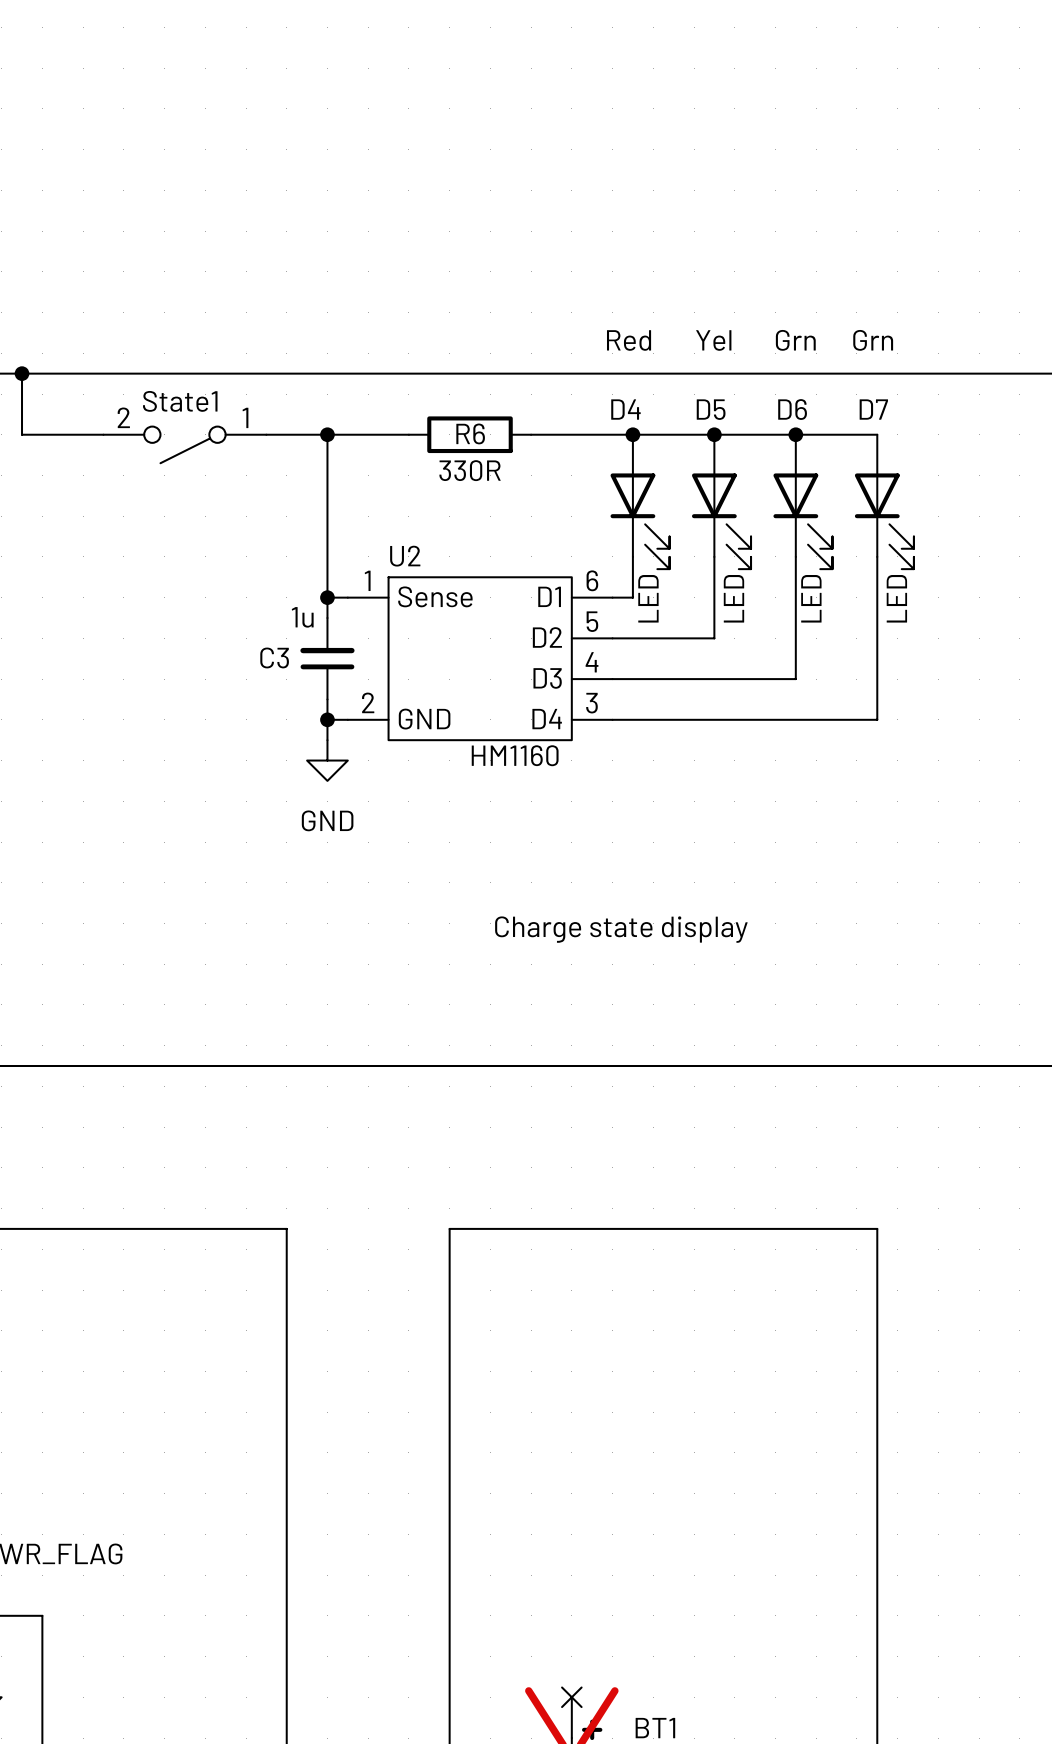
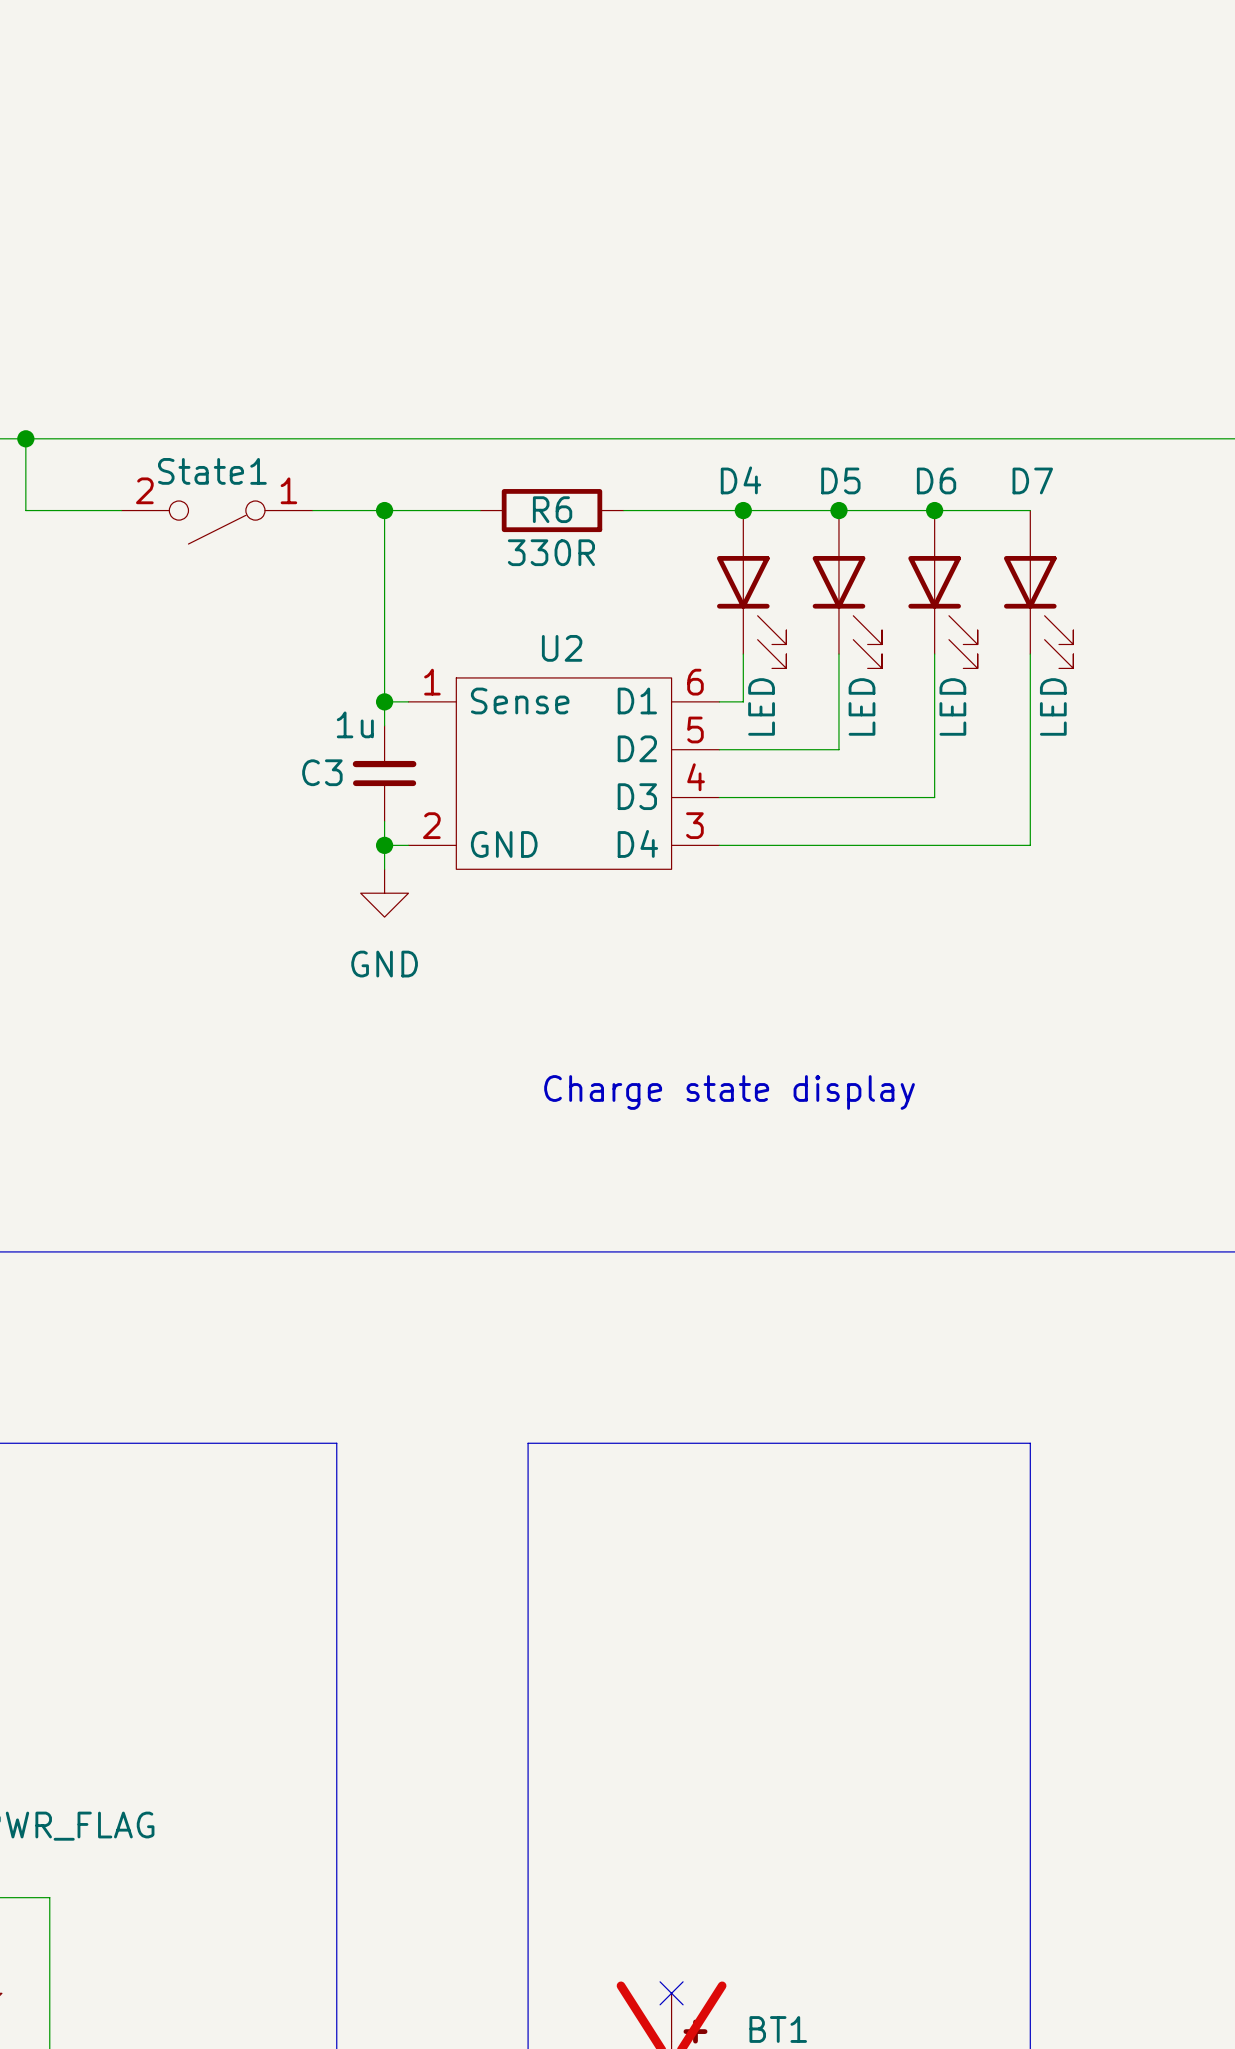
text: Red (629, 340) -> none
text: Yel (713, 340) -> none
text: Grn (795, 340) -> none
text: Grn (873, 340) -> none
U2 name position: U2 (405, 556) -> U2 (562, 648)
U2 value: HM1160 (515, 755) -> none

